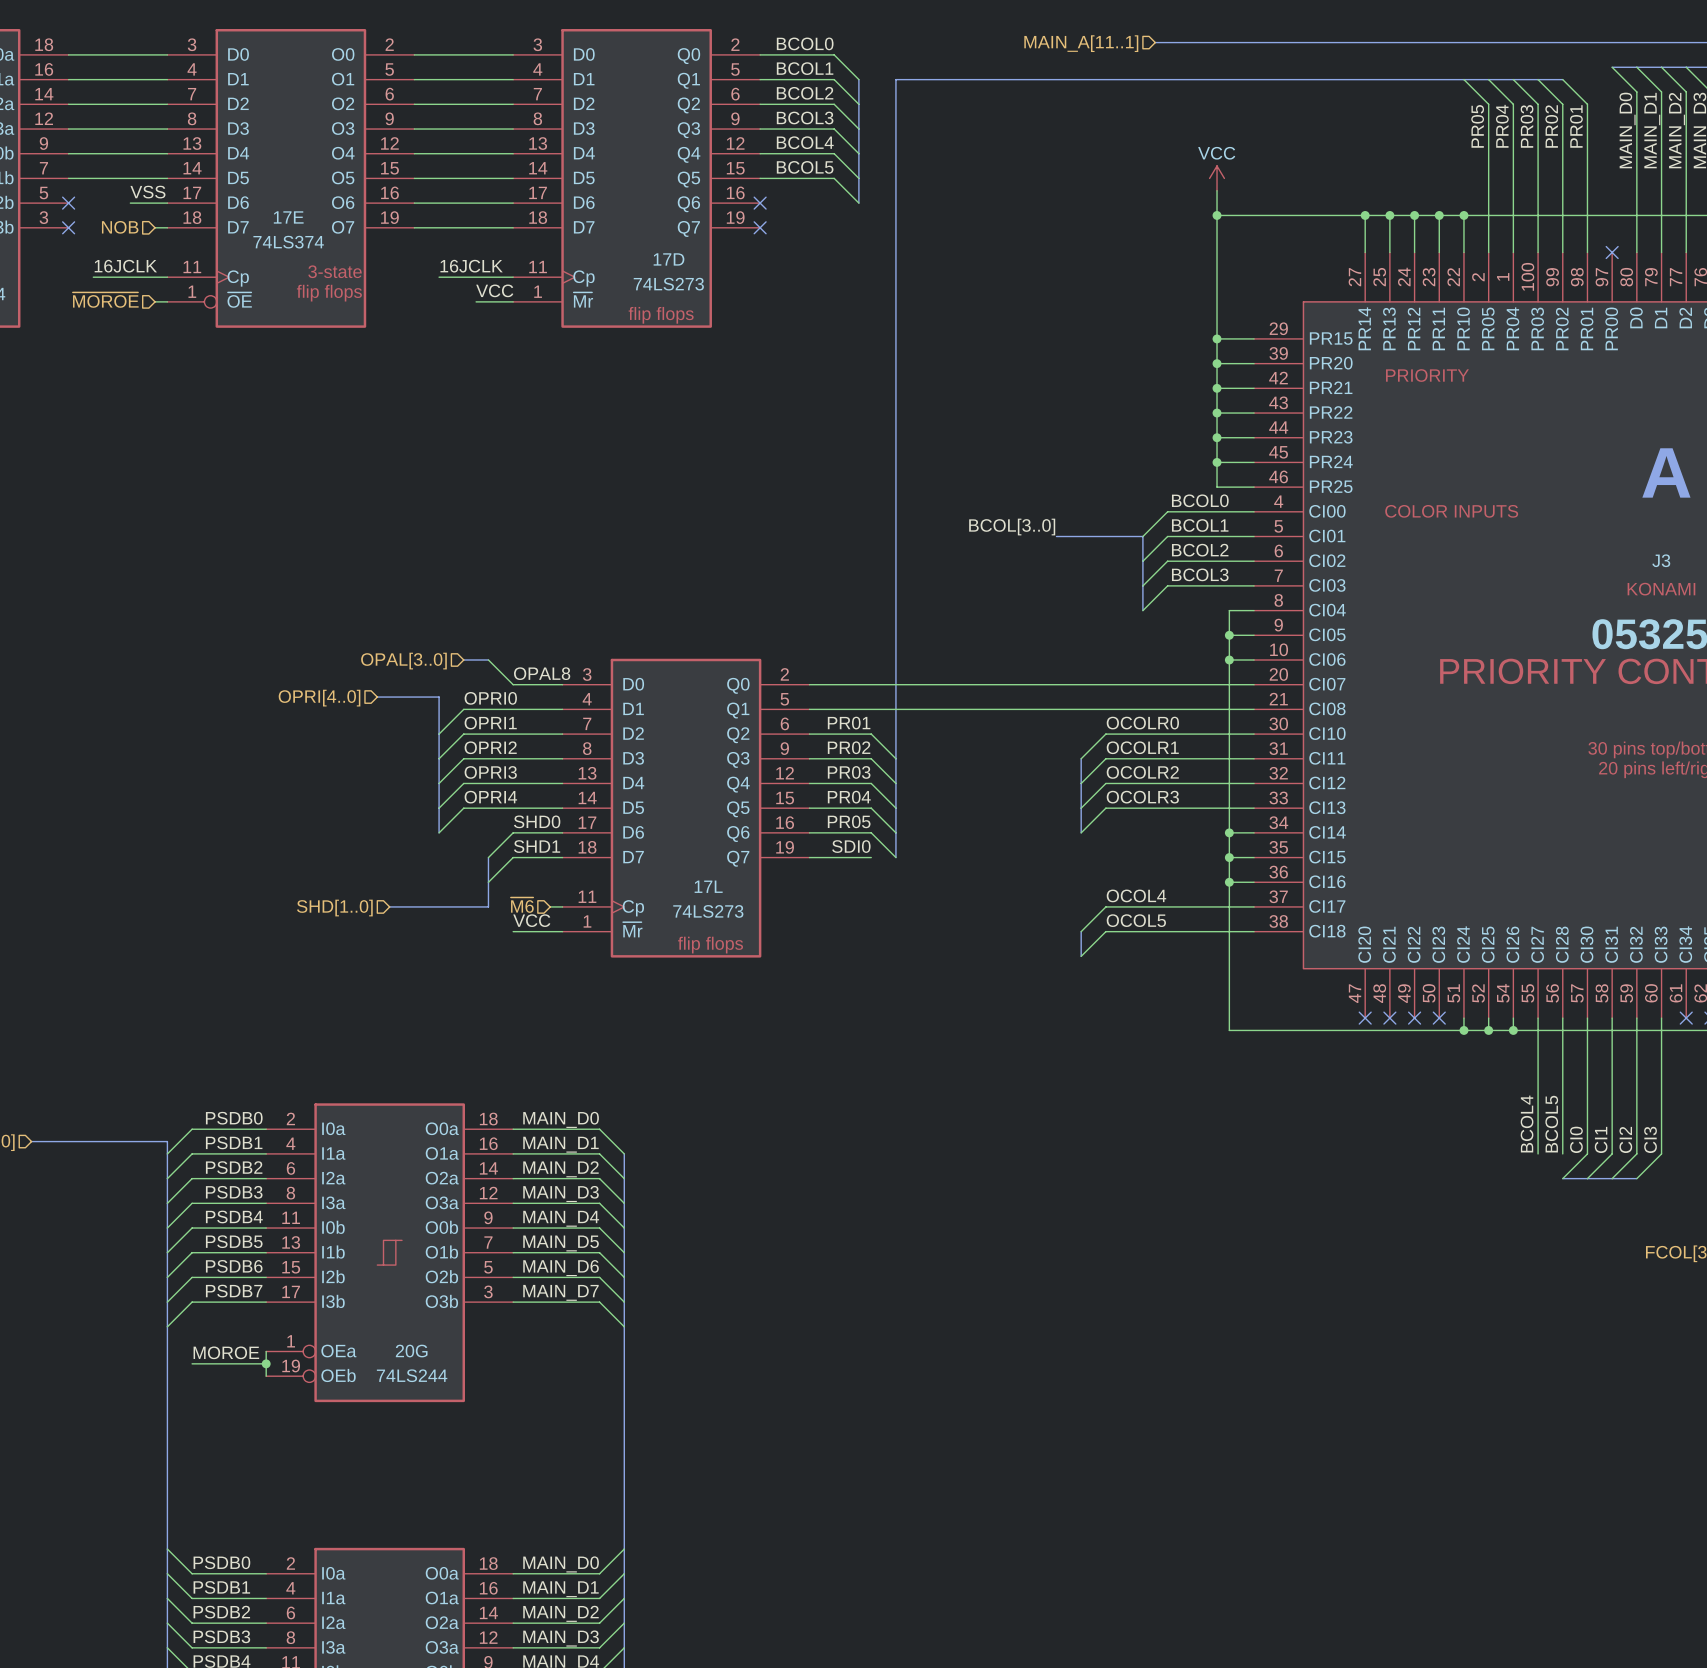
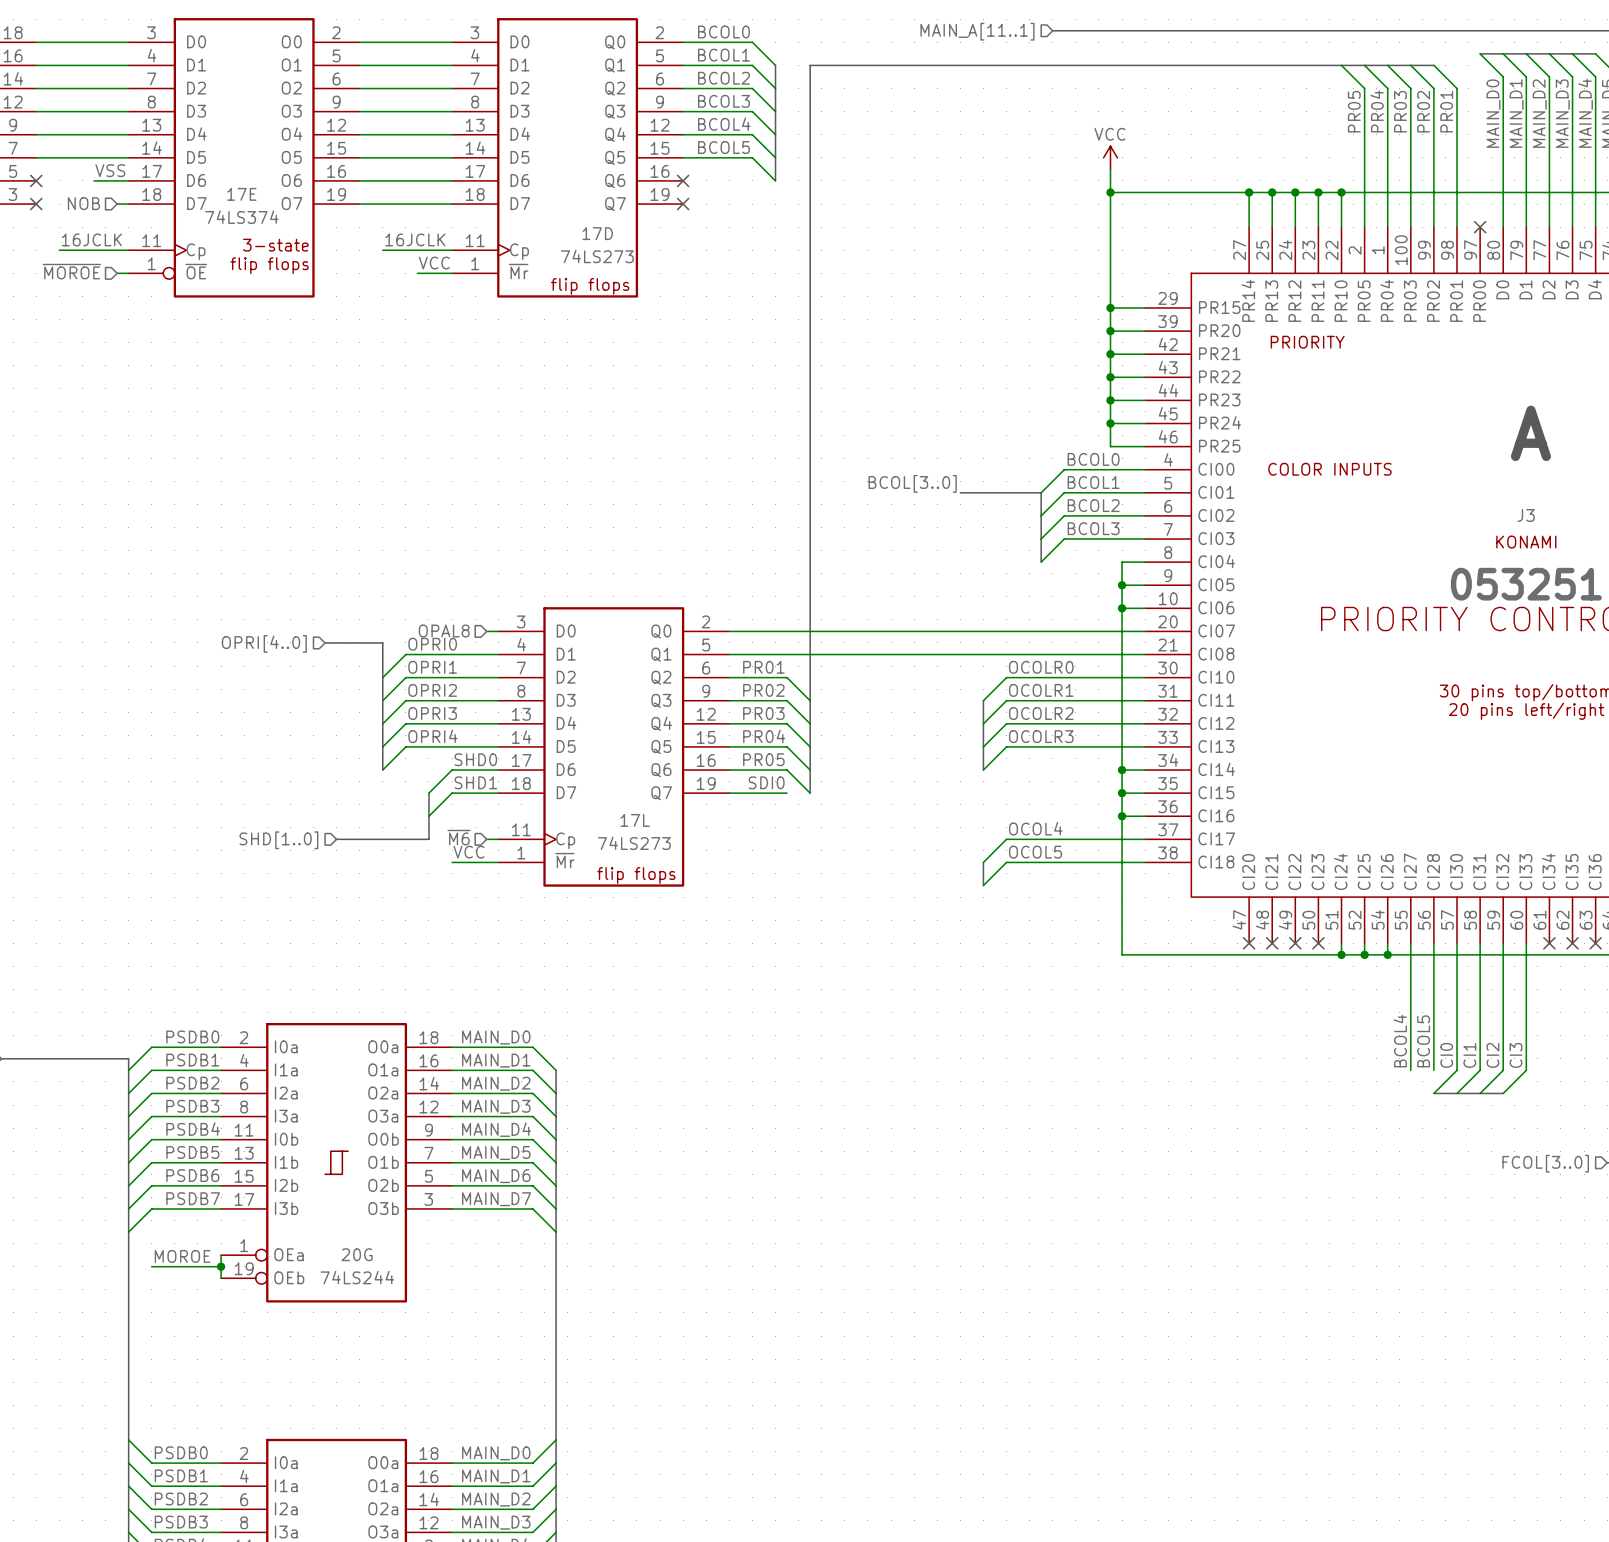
bus: (463, 659) (488, 659) -> none
wire: (488, 659) (513, 684) (550, 684) -> none
hierarchical label: OPAL[3..0] (403, 661) -> none
label: OPAL8 (542, 673) -> none
hierarchical label: none -> OPAL8 (444, 630)

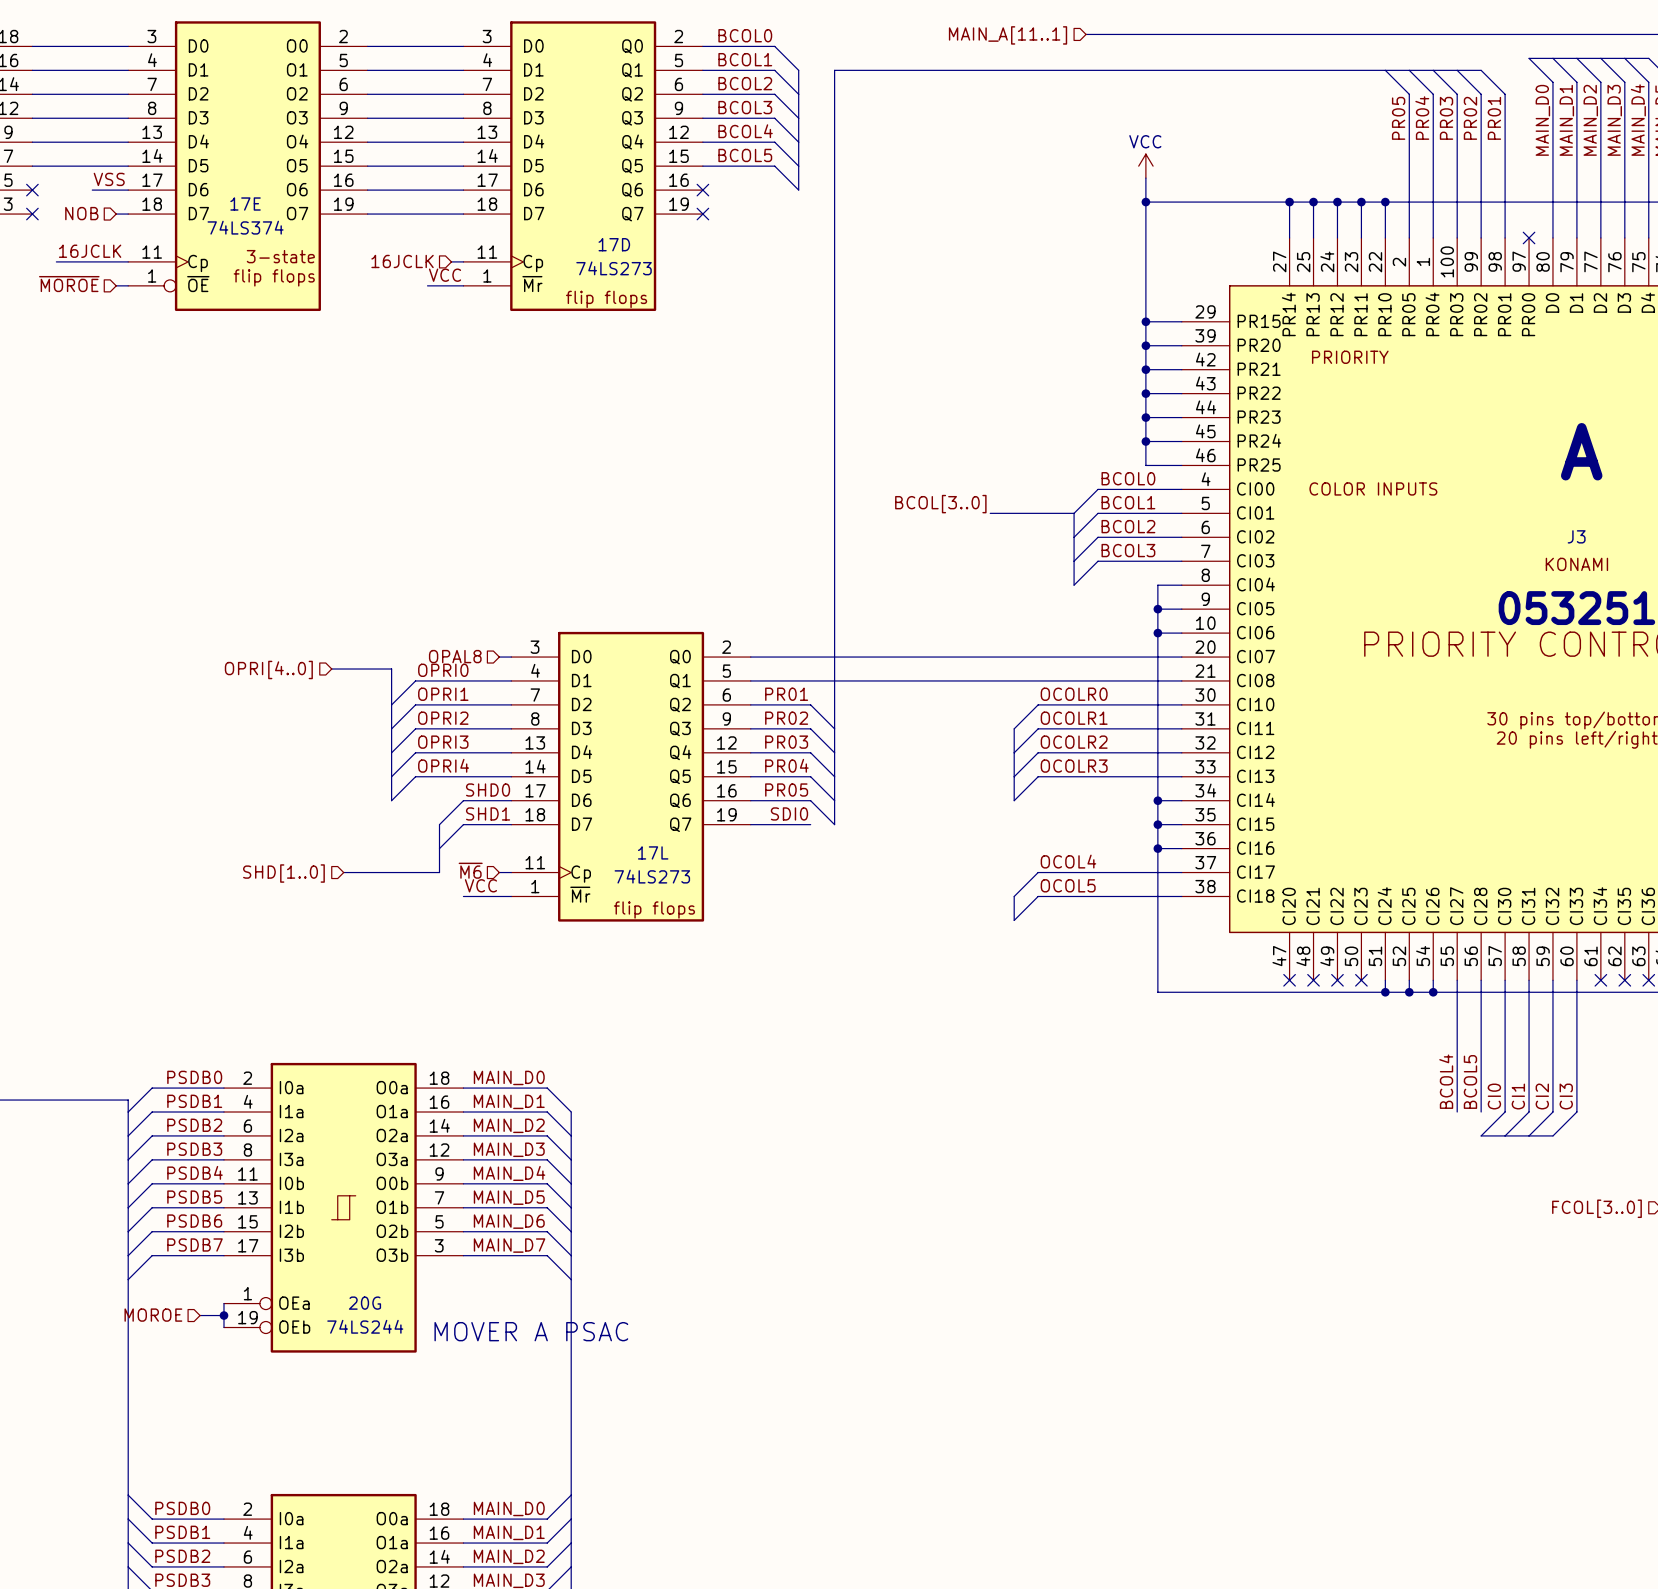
label: 16JCLK (415, 239) -> none
hierarchical label: none -> 16JCLK (402, 261)
wire: (382, 250) (440, 250) -> none
label: MOROE (182, 1256) -> none
wire: (151, 1266) (197, 1266) -> none
hierarchical label: none -> MOROE (153, 1315)
text: none -> MOVER A PSAC (531, 1331)

